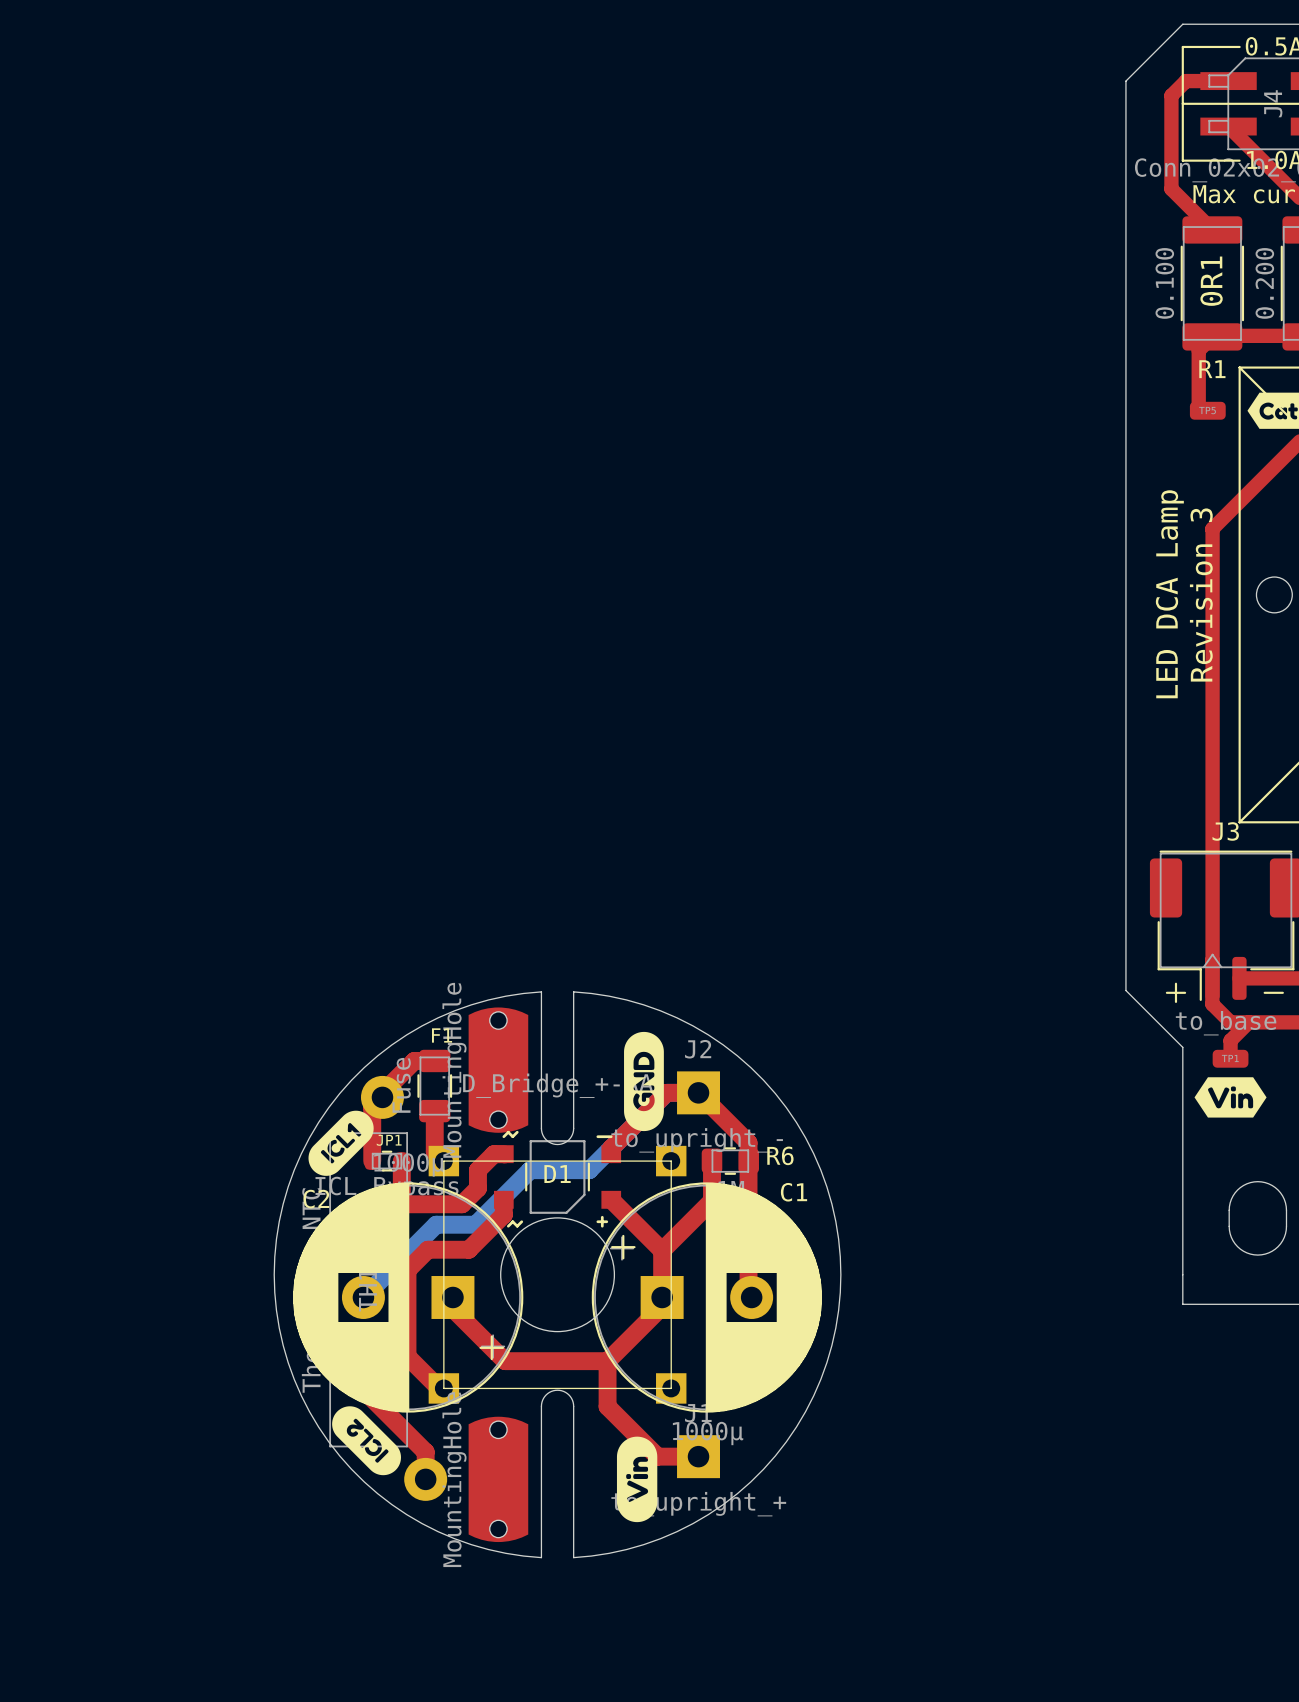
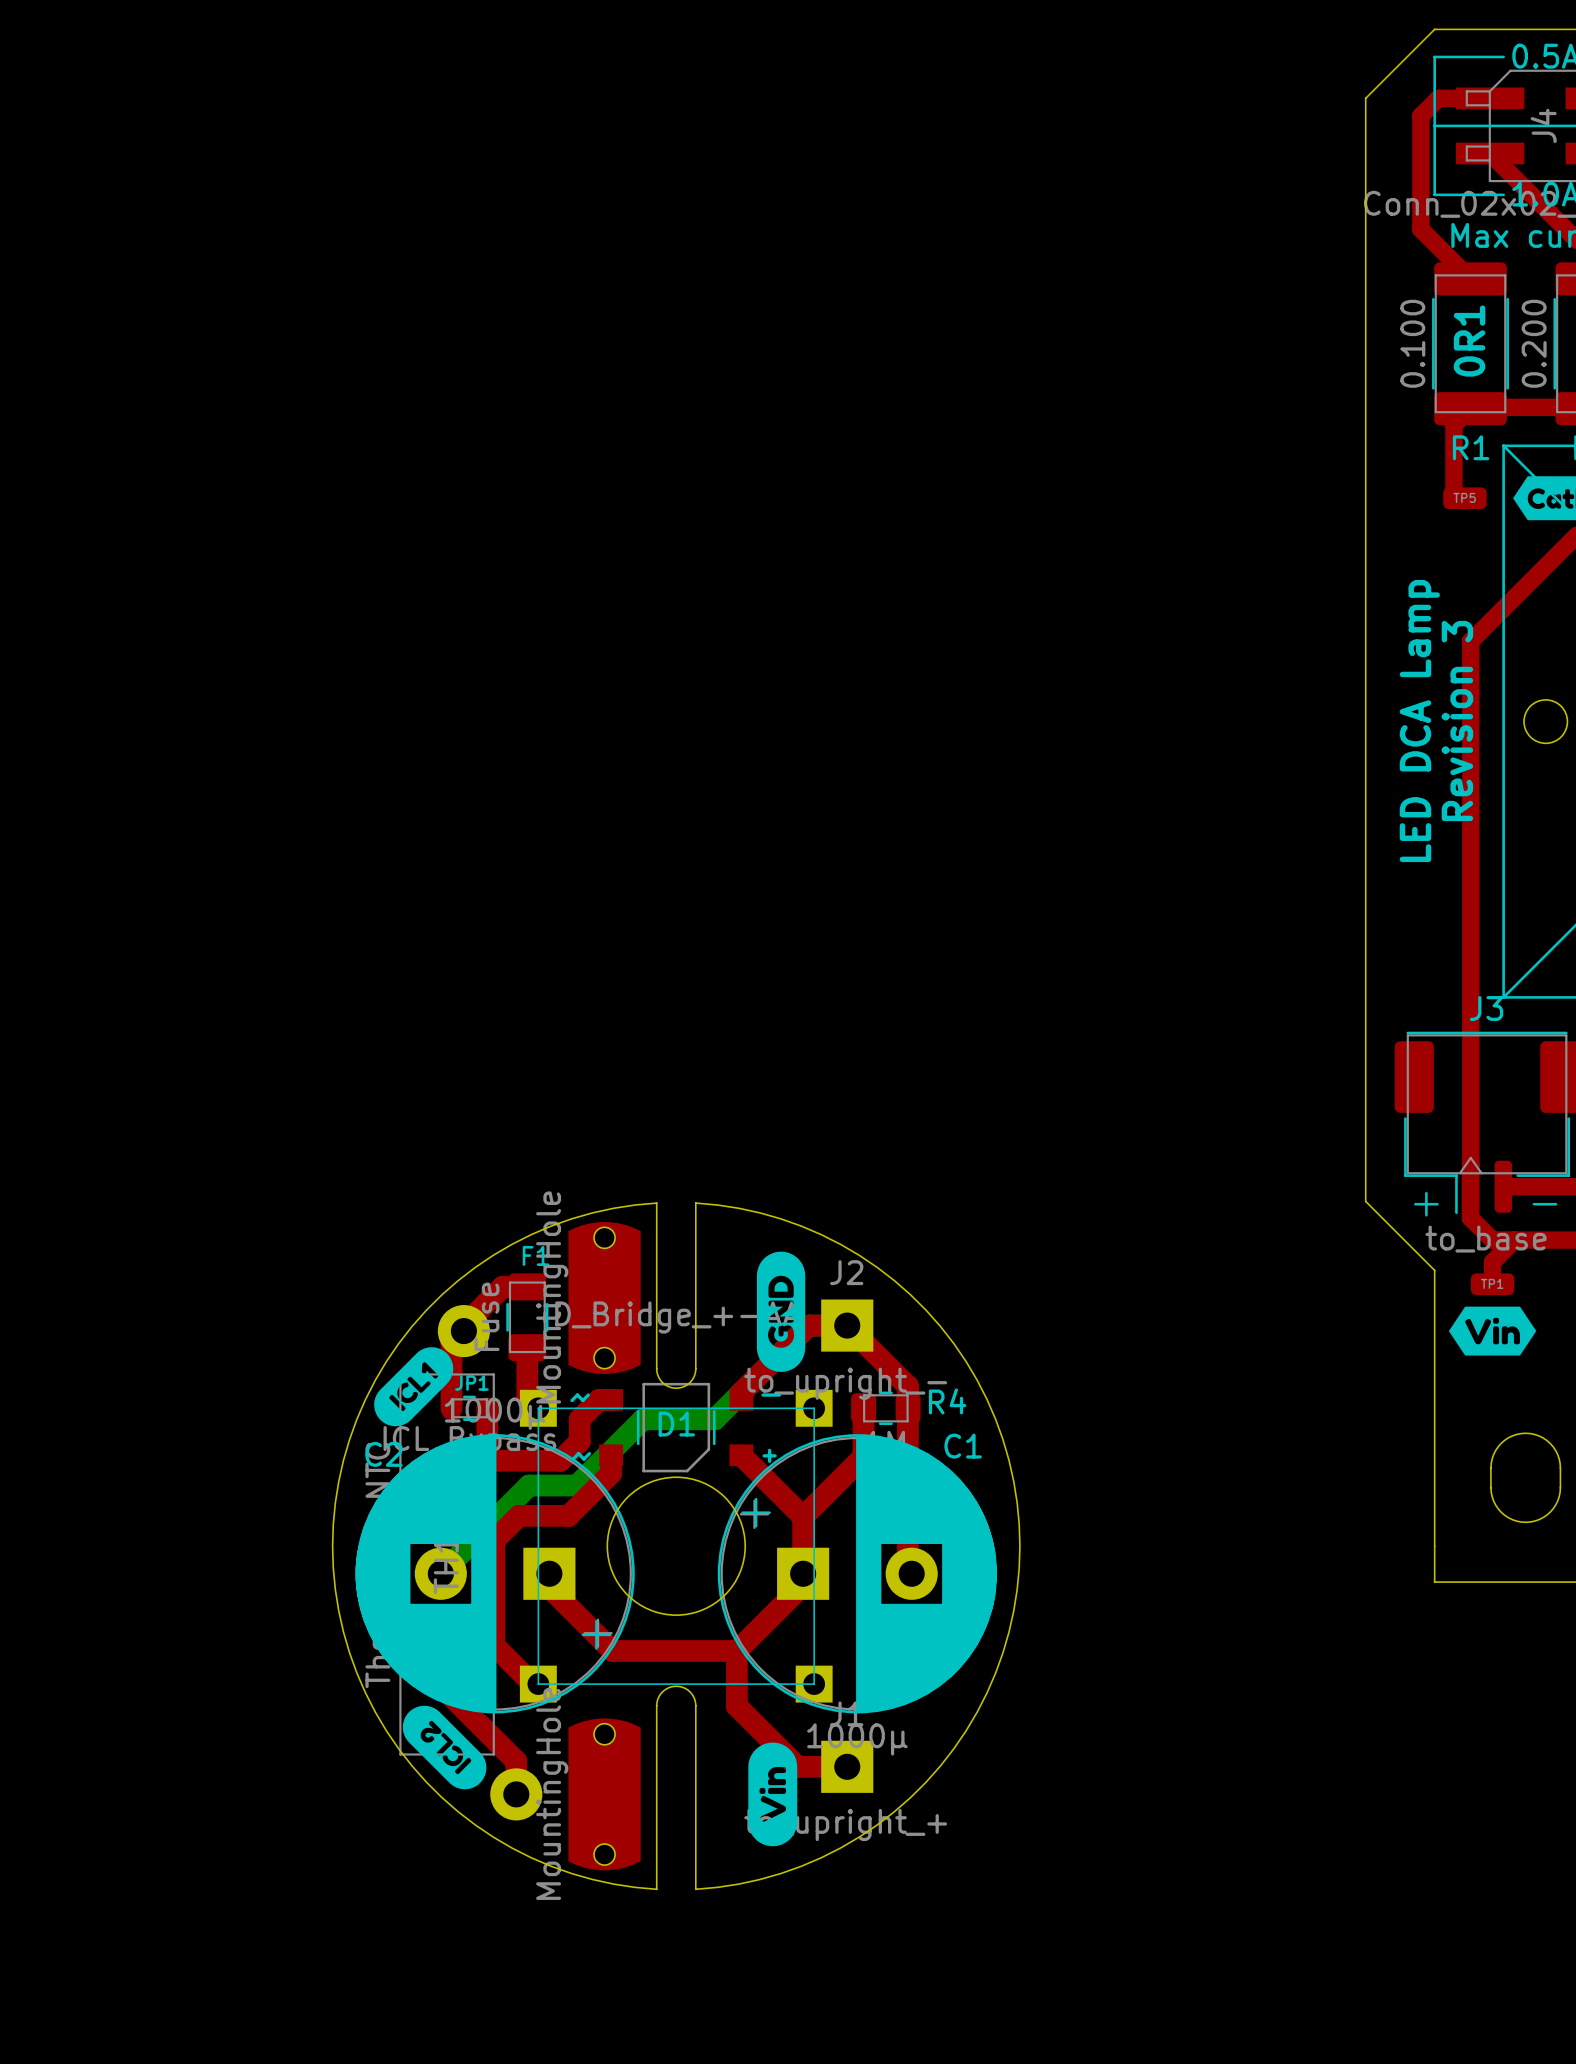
D1 footprint: [493, 1130, 622, 1228] -> [570, 1382, 782, 1473]
R6 name: R6 (780, 1155) -> R4 (947, 1401)

